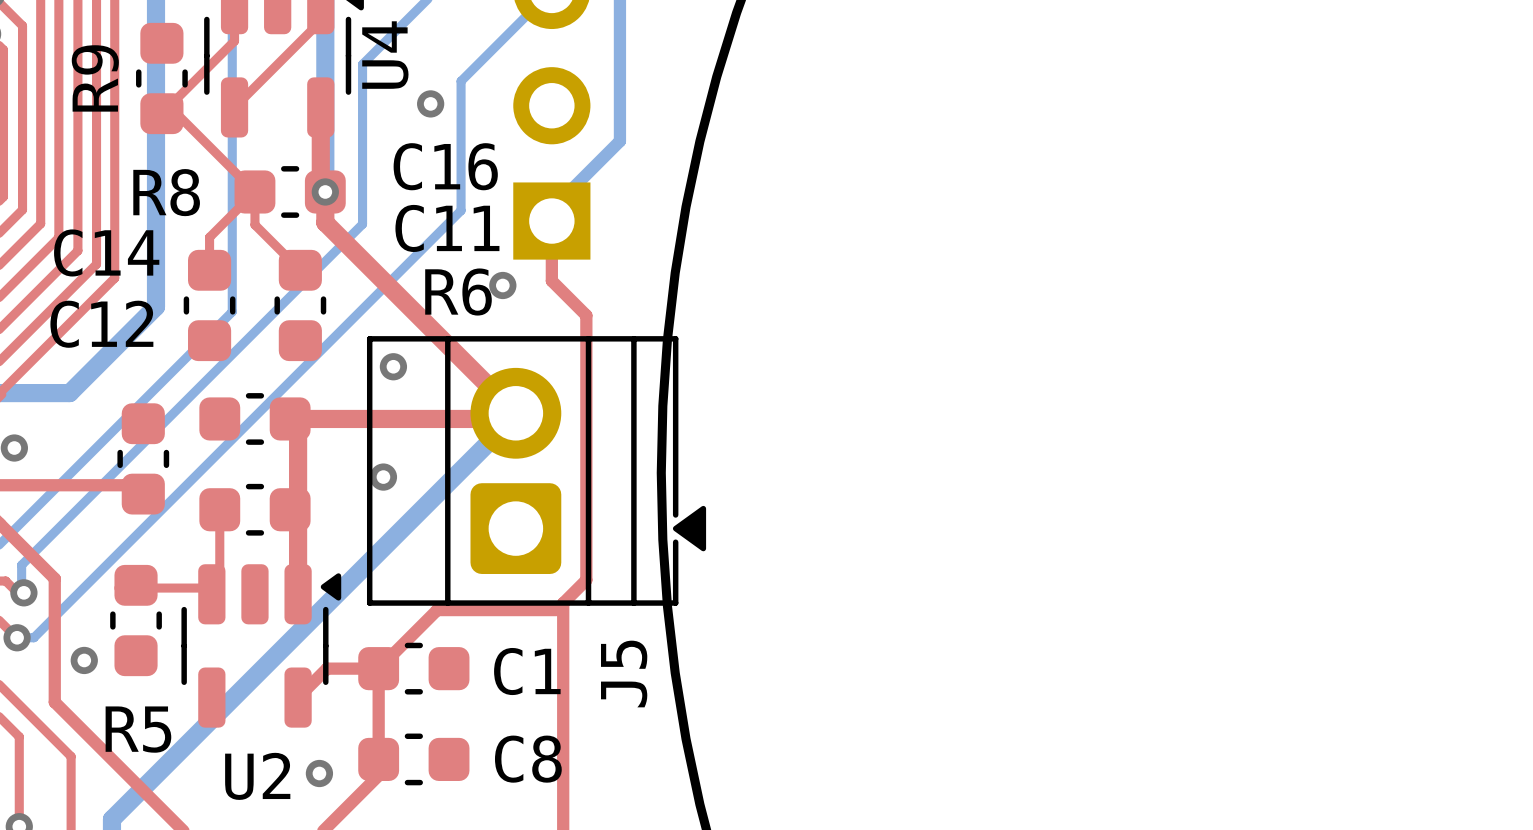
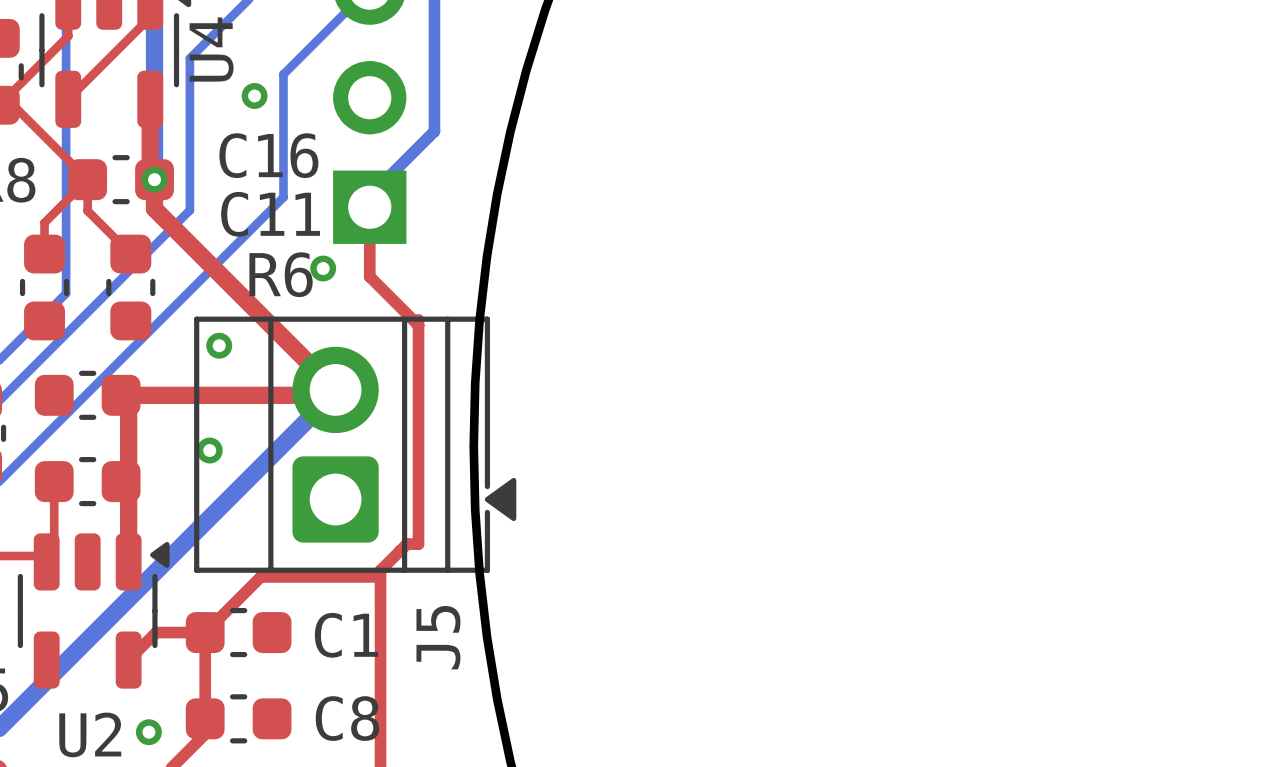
top track: (551, 280) (586, 315) (586, 580) -> (418, 319) (418, 544) (406, 544) (402, 548)
top track: none -> (369, 264) (369, 276) (418, 325)

